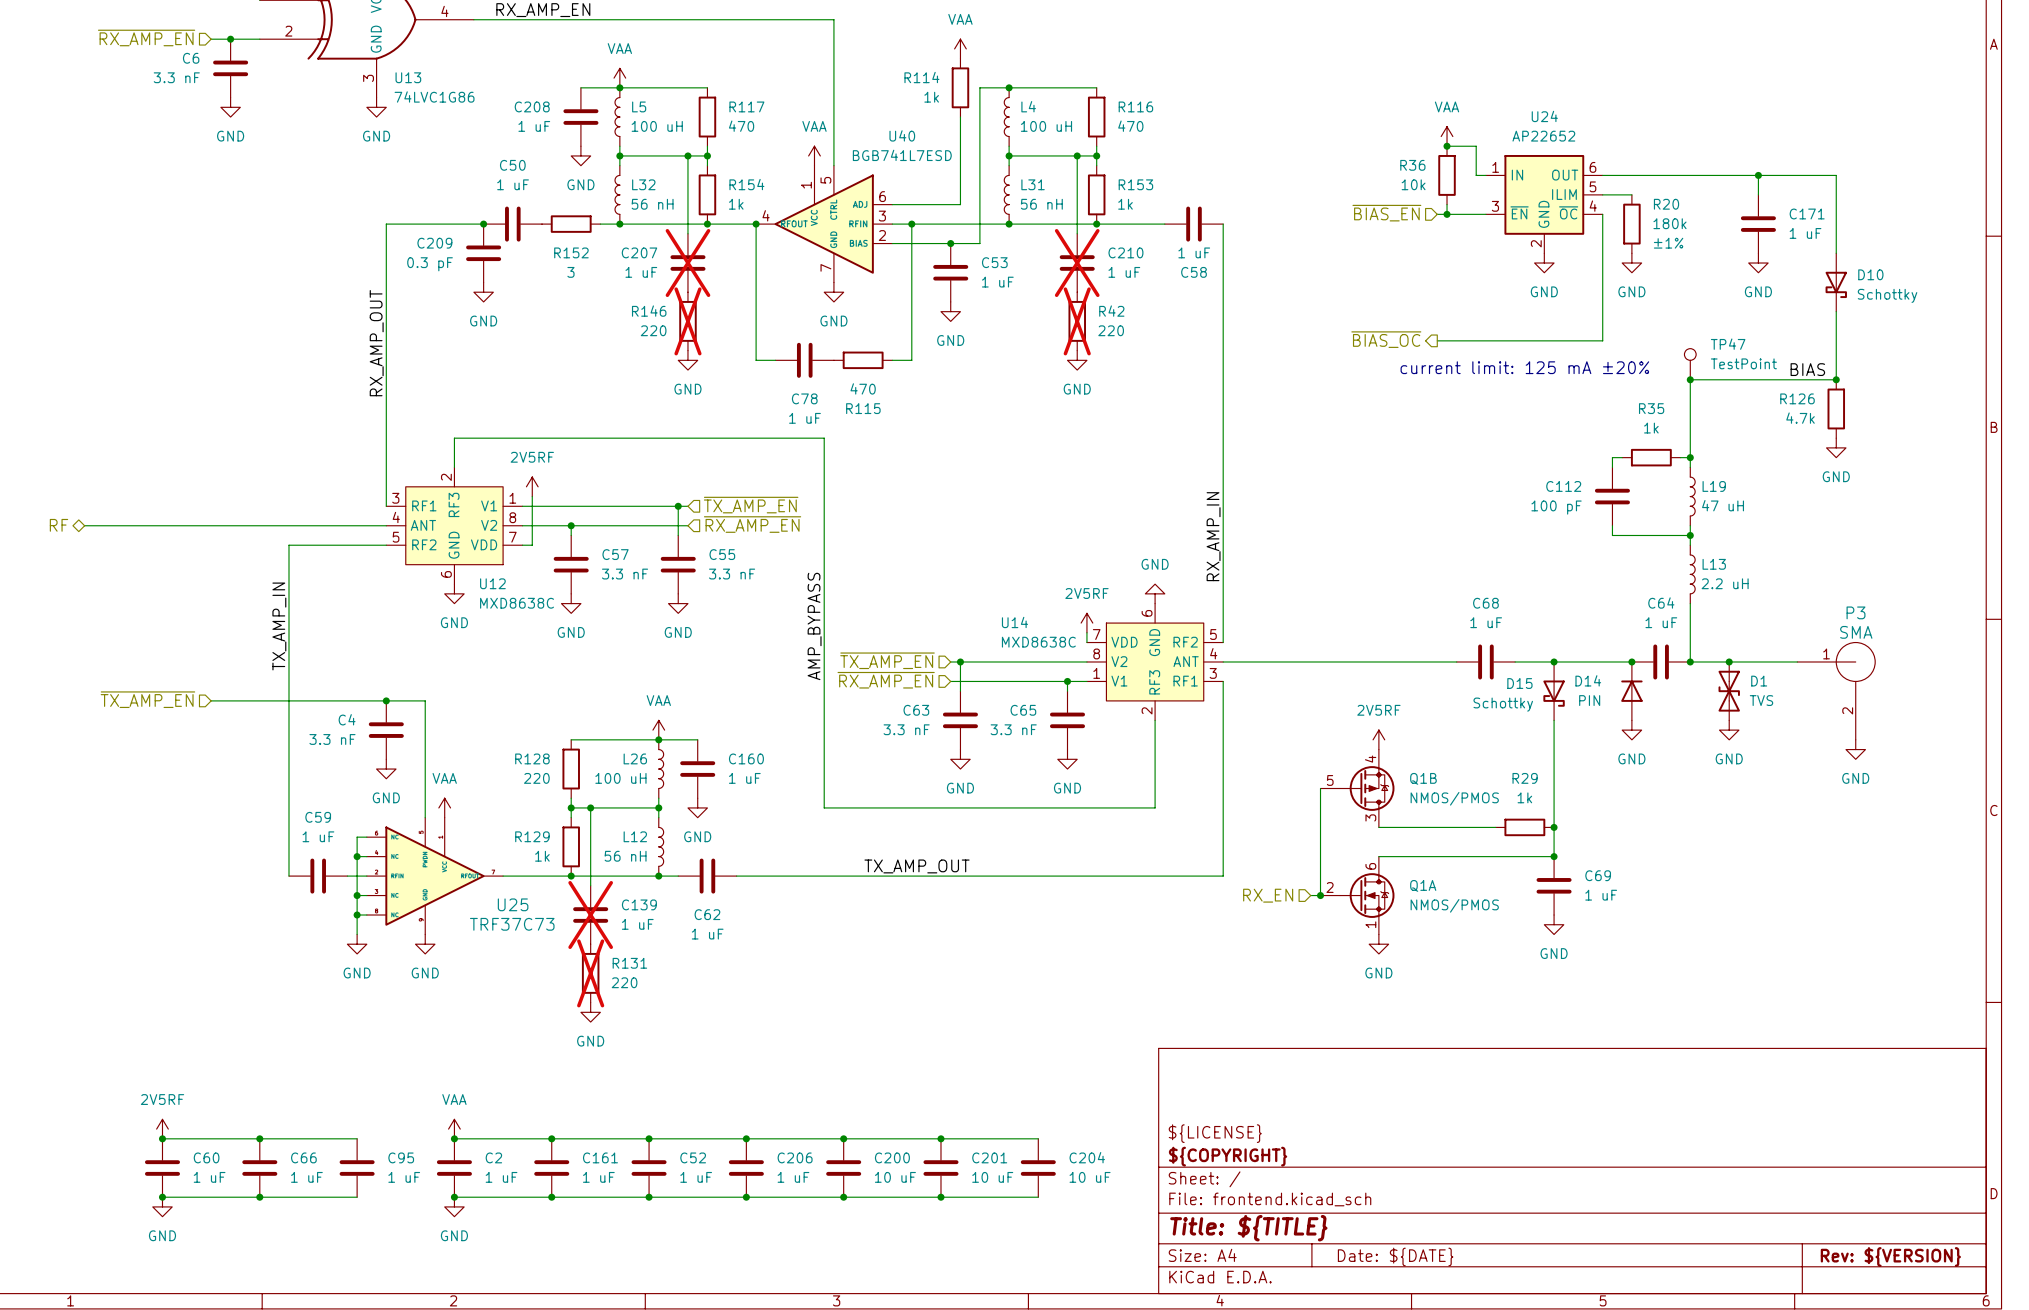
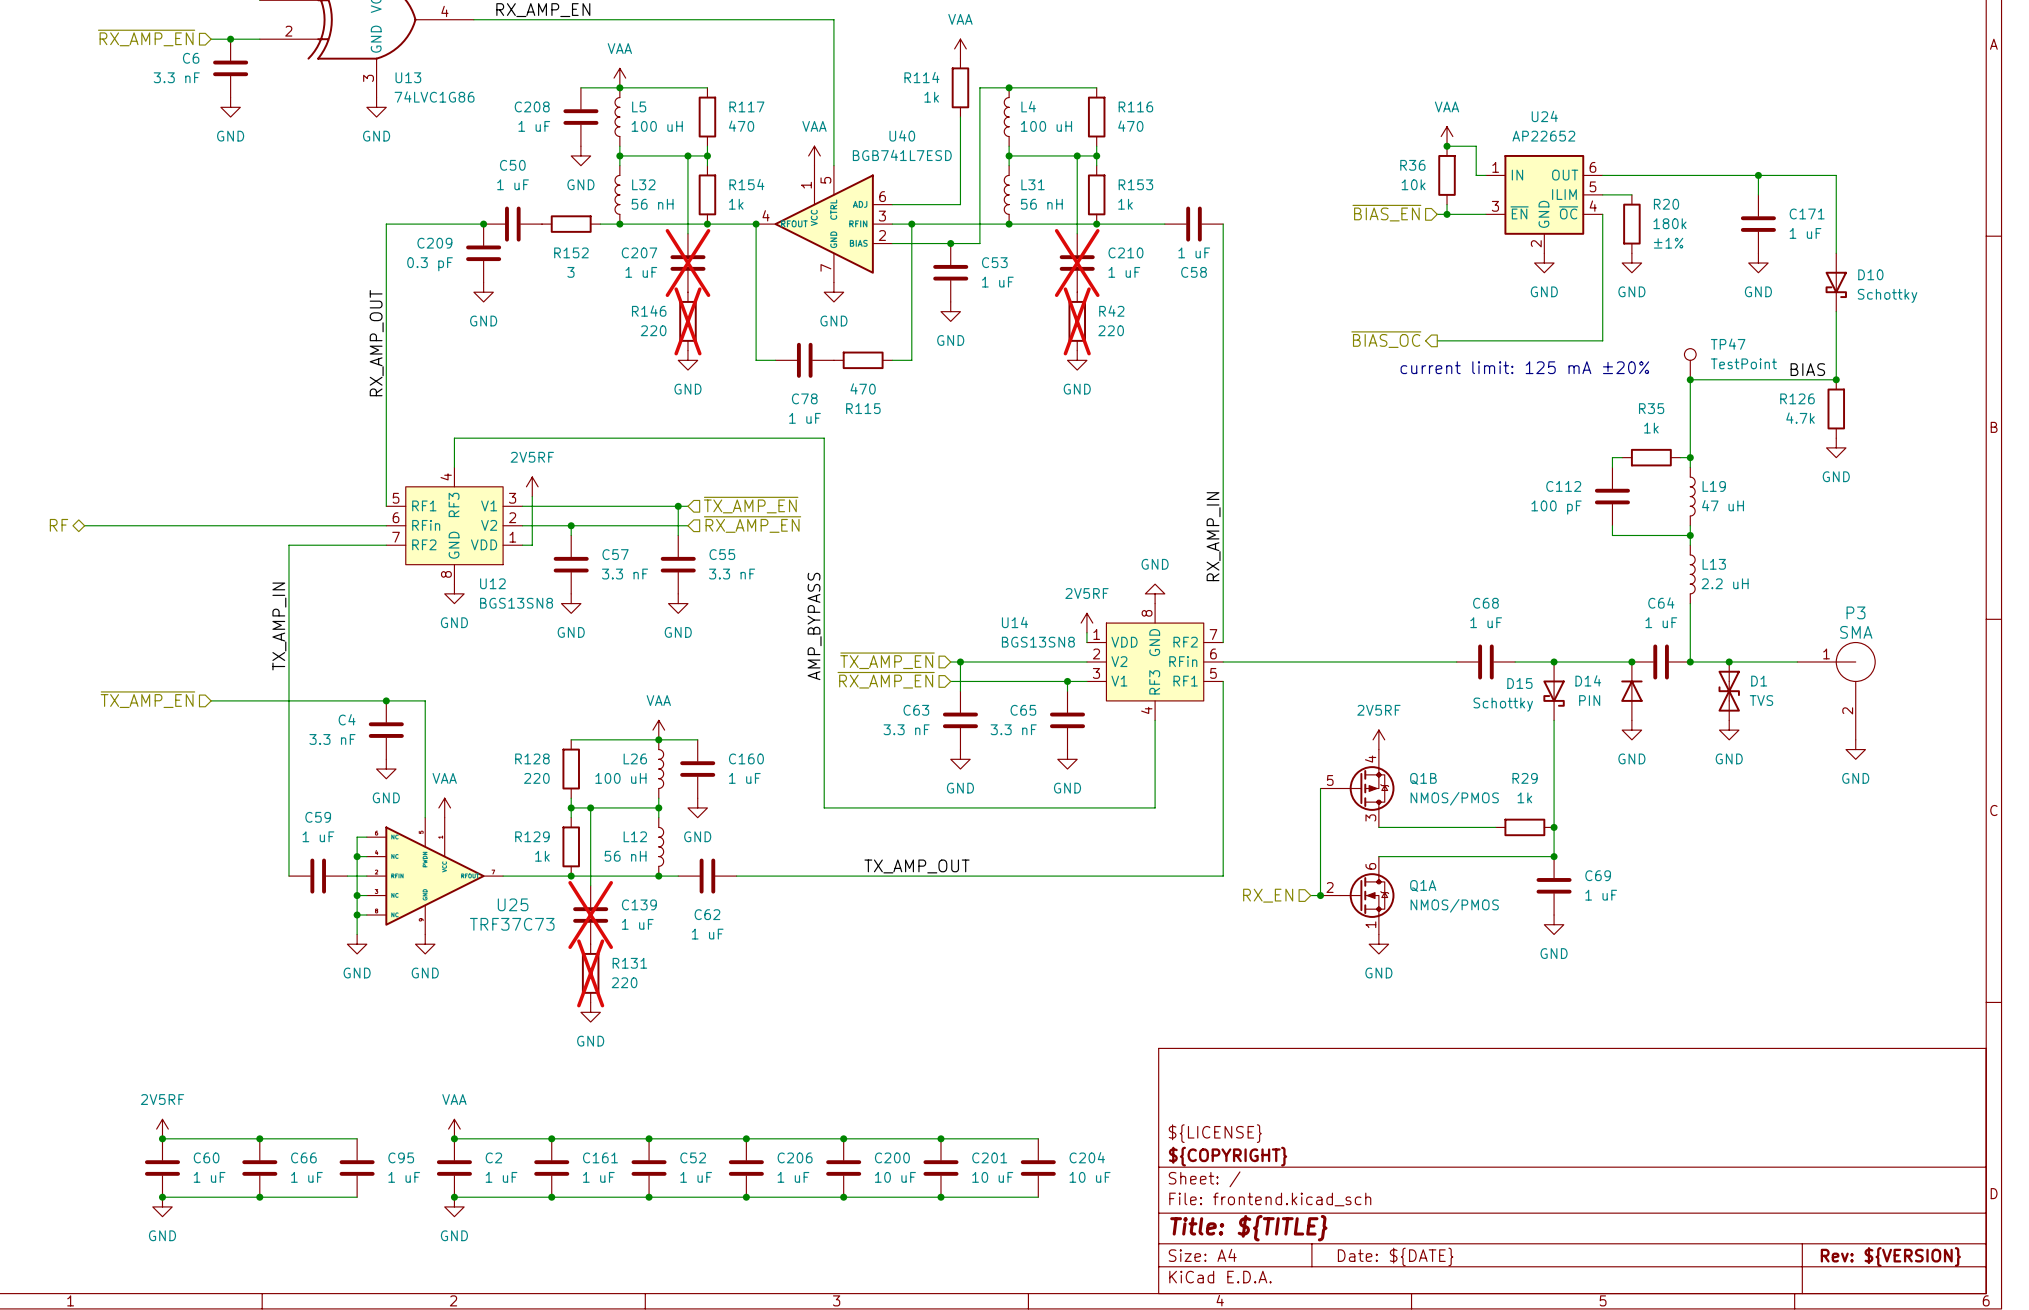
U12 symbol: [386, 467, 523, 585] -> [386, 467, 523, 585]
U12 value: MXD8638C (517, 603) -> BGS13SN8 (516, 603)
U14 symbol: [1086, 603, 1224, 721] -> [1086, 603, 1224, 721]
U14 value: MXD8638C (1038, 642) -> BGS13SN8 (1038, 642)

